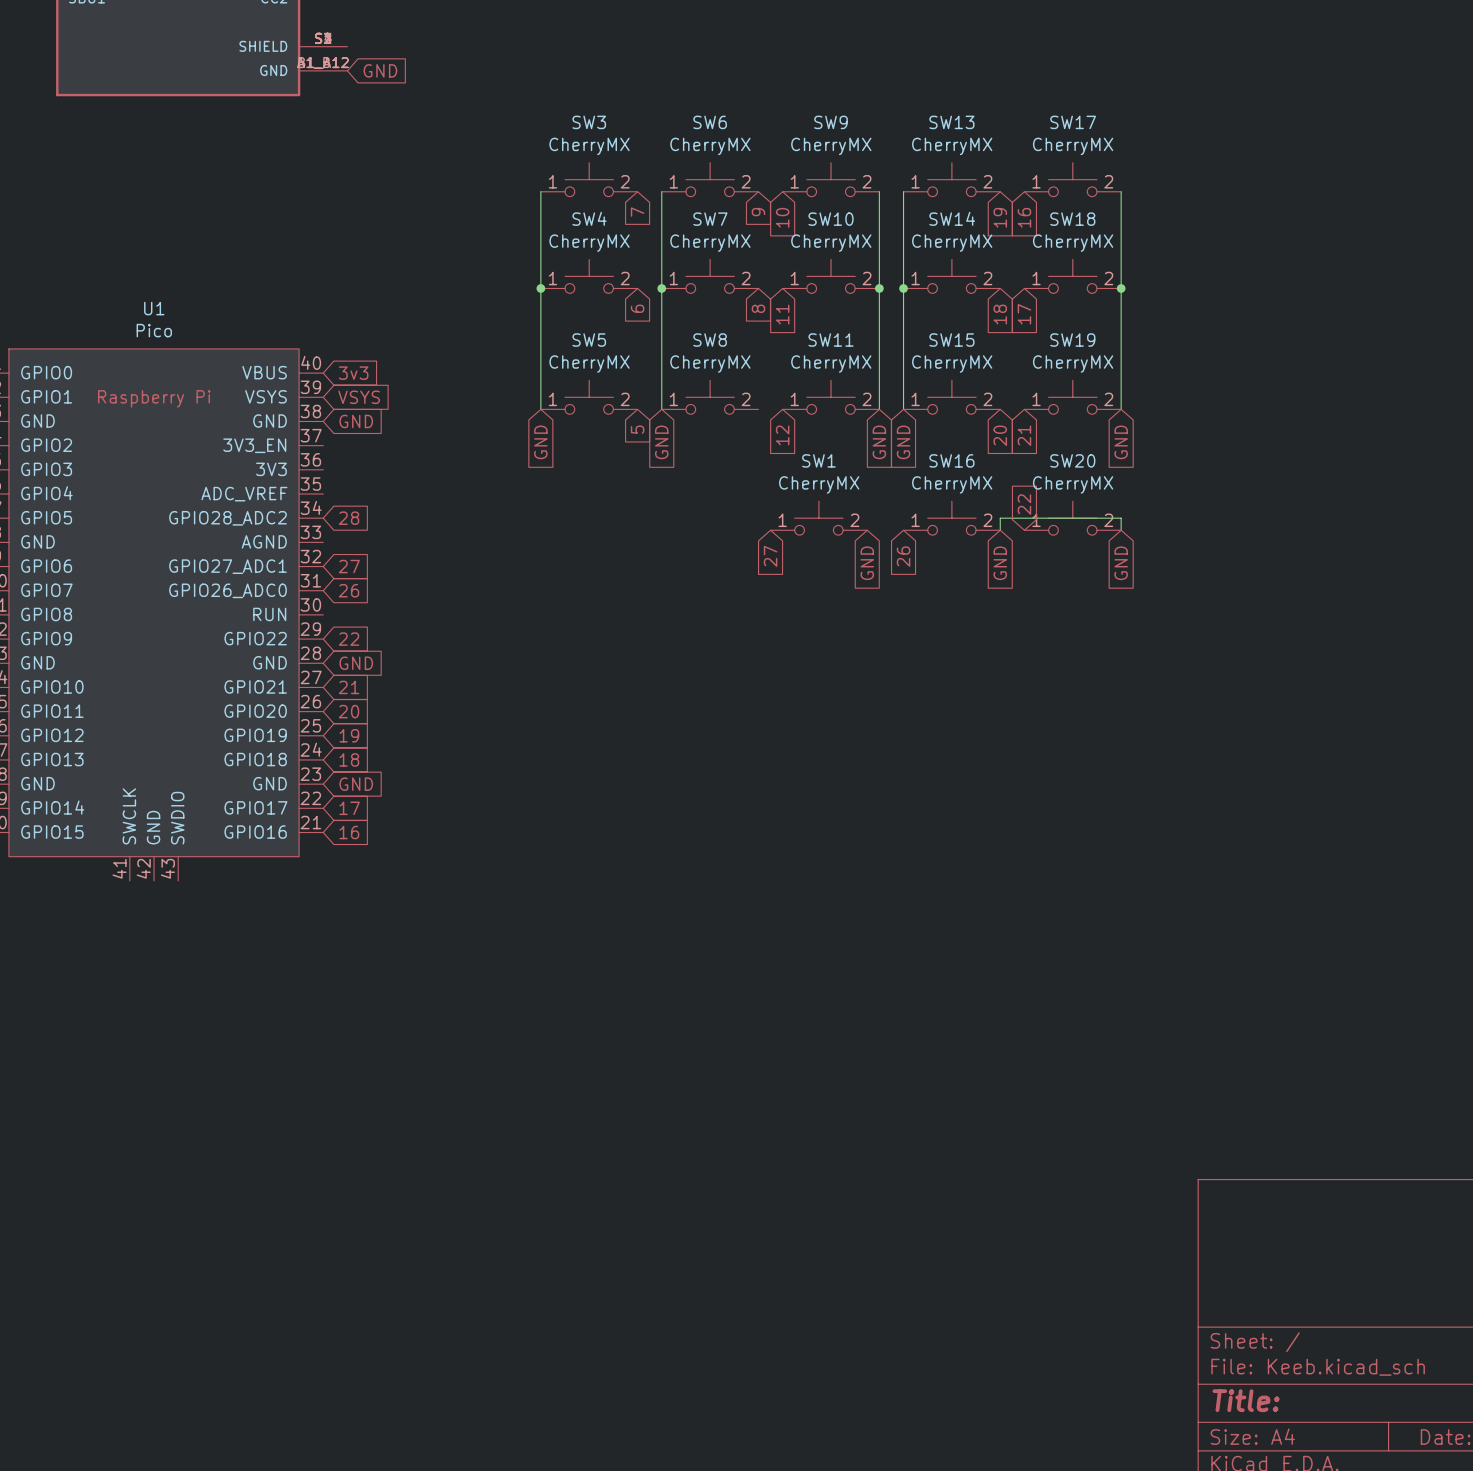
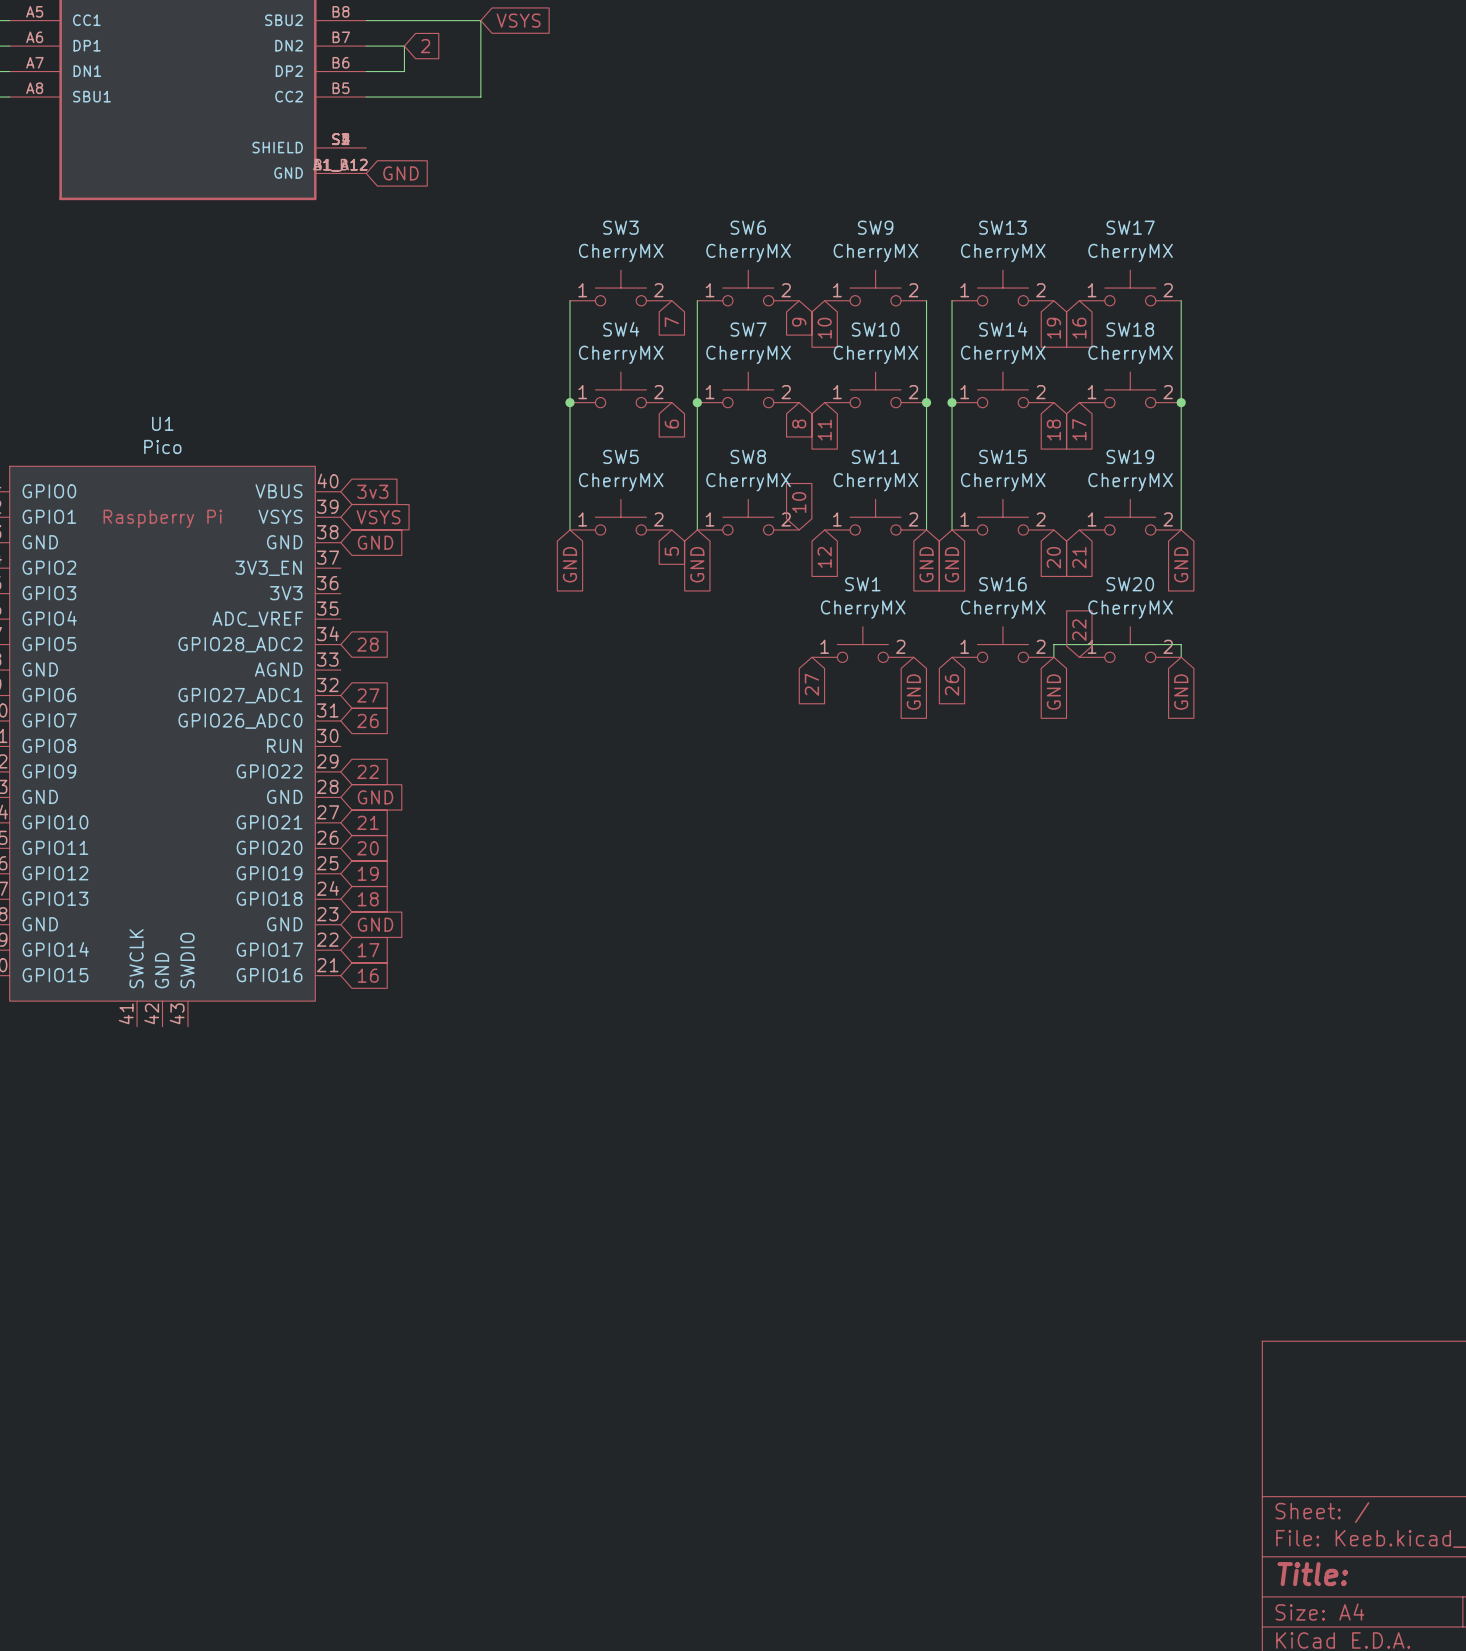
global label: none -> 10 (799, 502)

